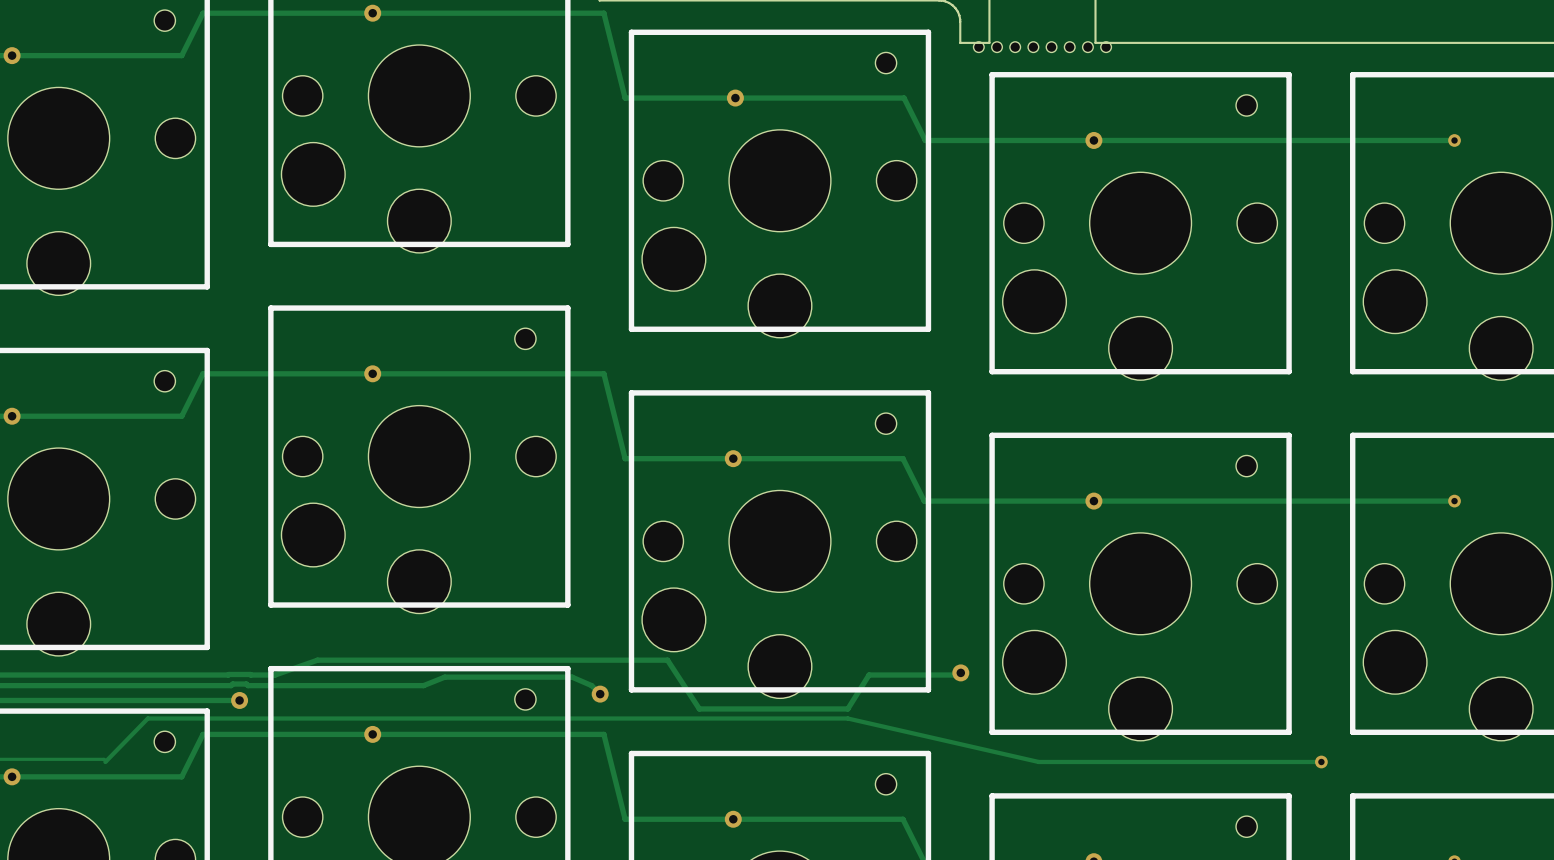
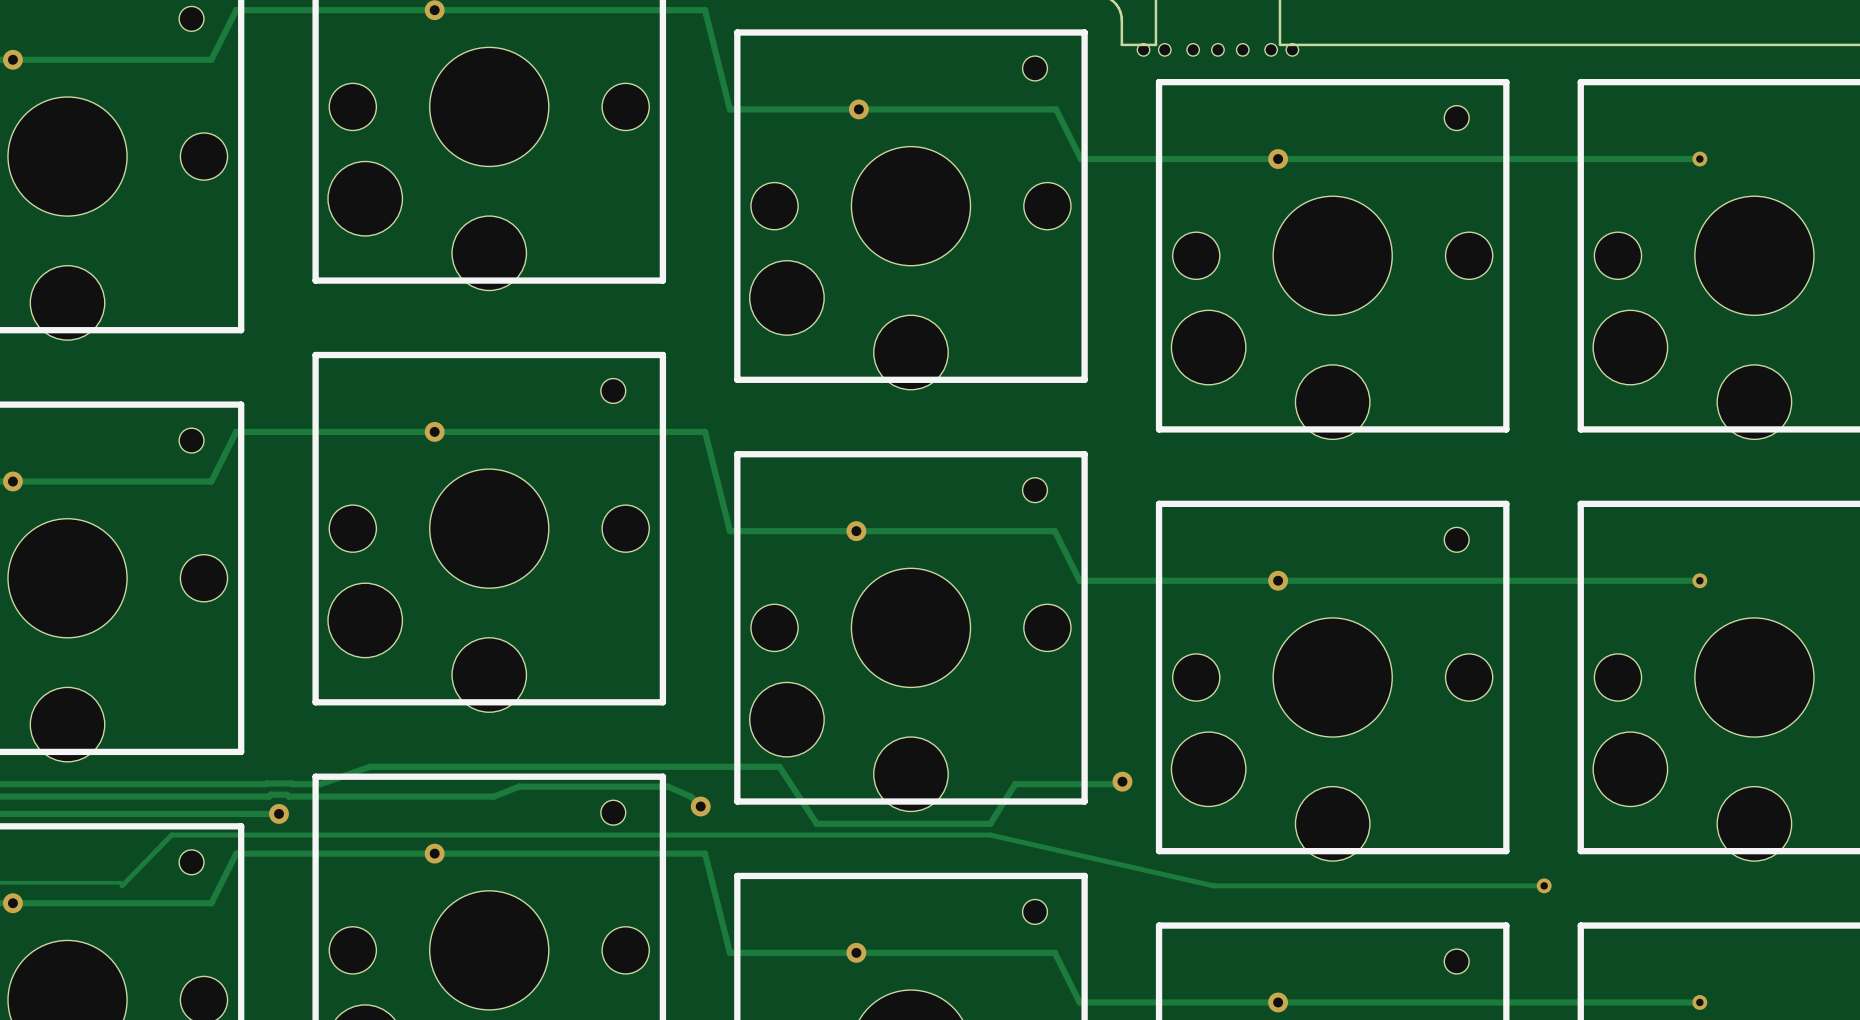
part: (1015, 47) -> none
part: none -> (1193, 49)
part: (1033, 47) -> none
part: none -> (1217, 49)
part: (1051, 47) -> none
part: none -> (1242, 49)
part: (1069, 47) -> none

